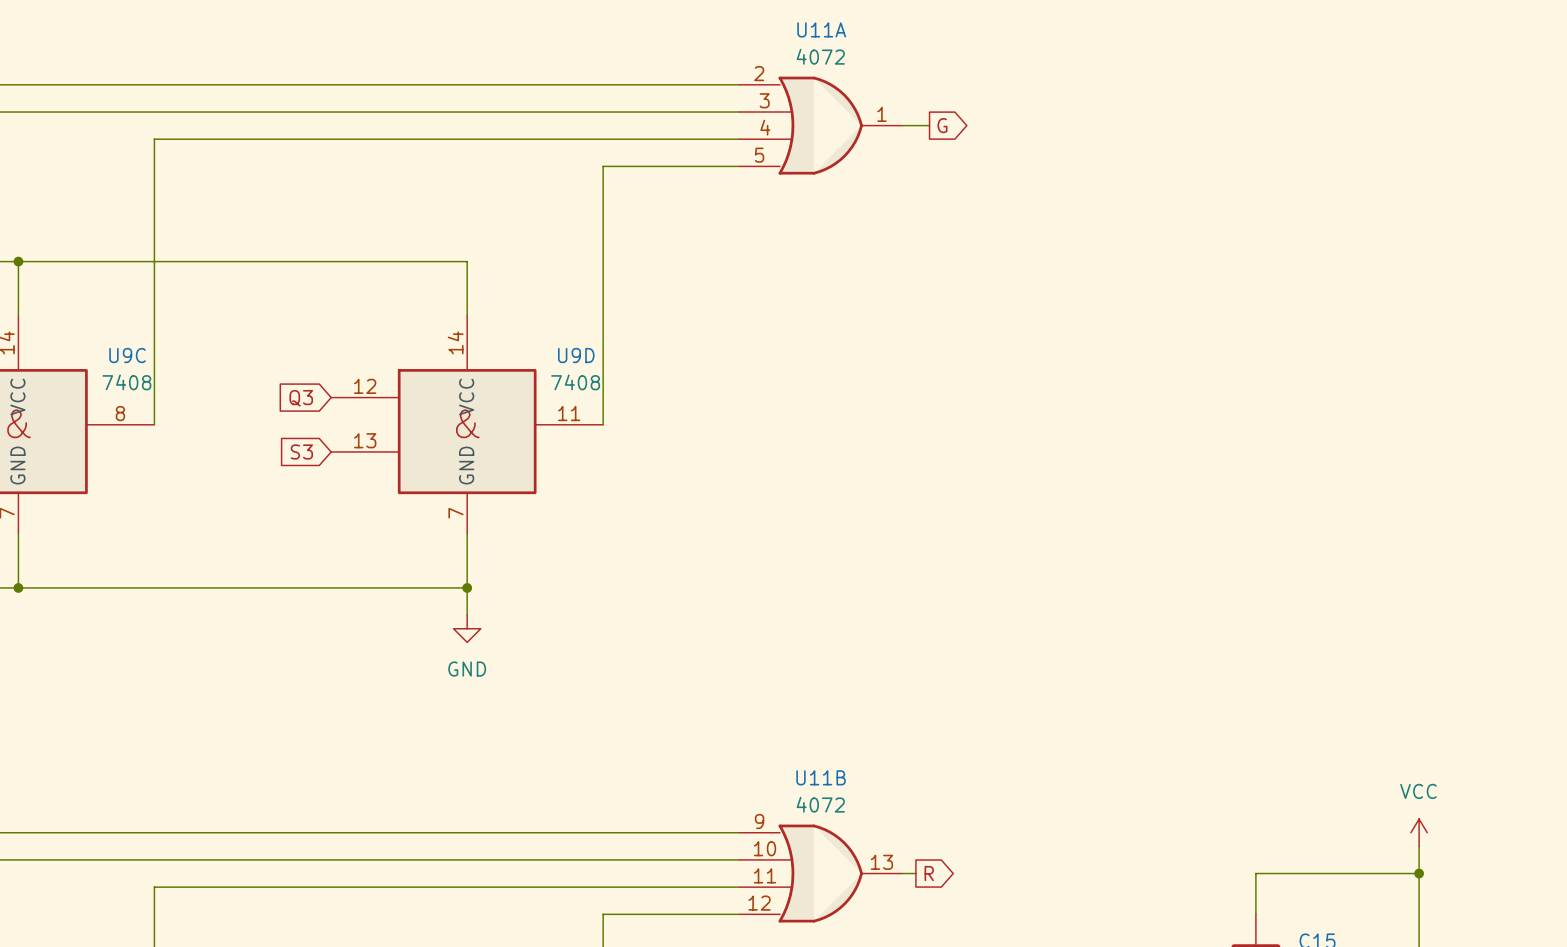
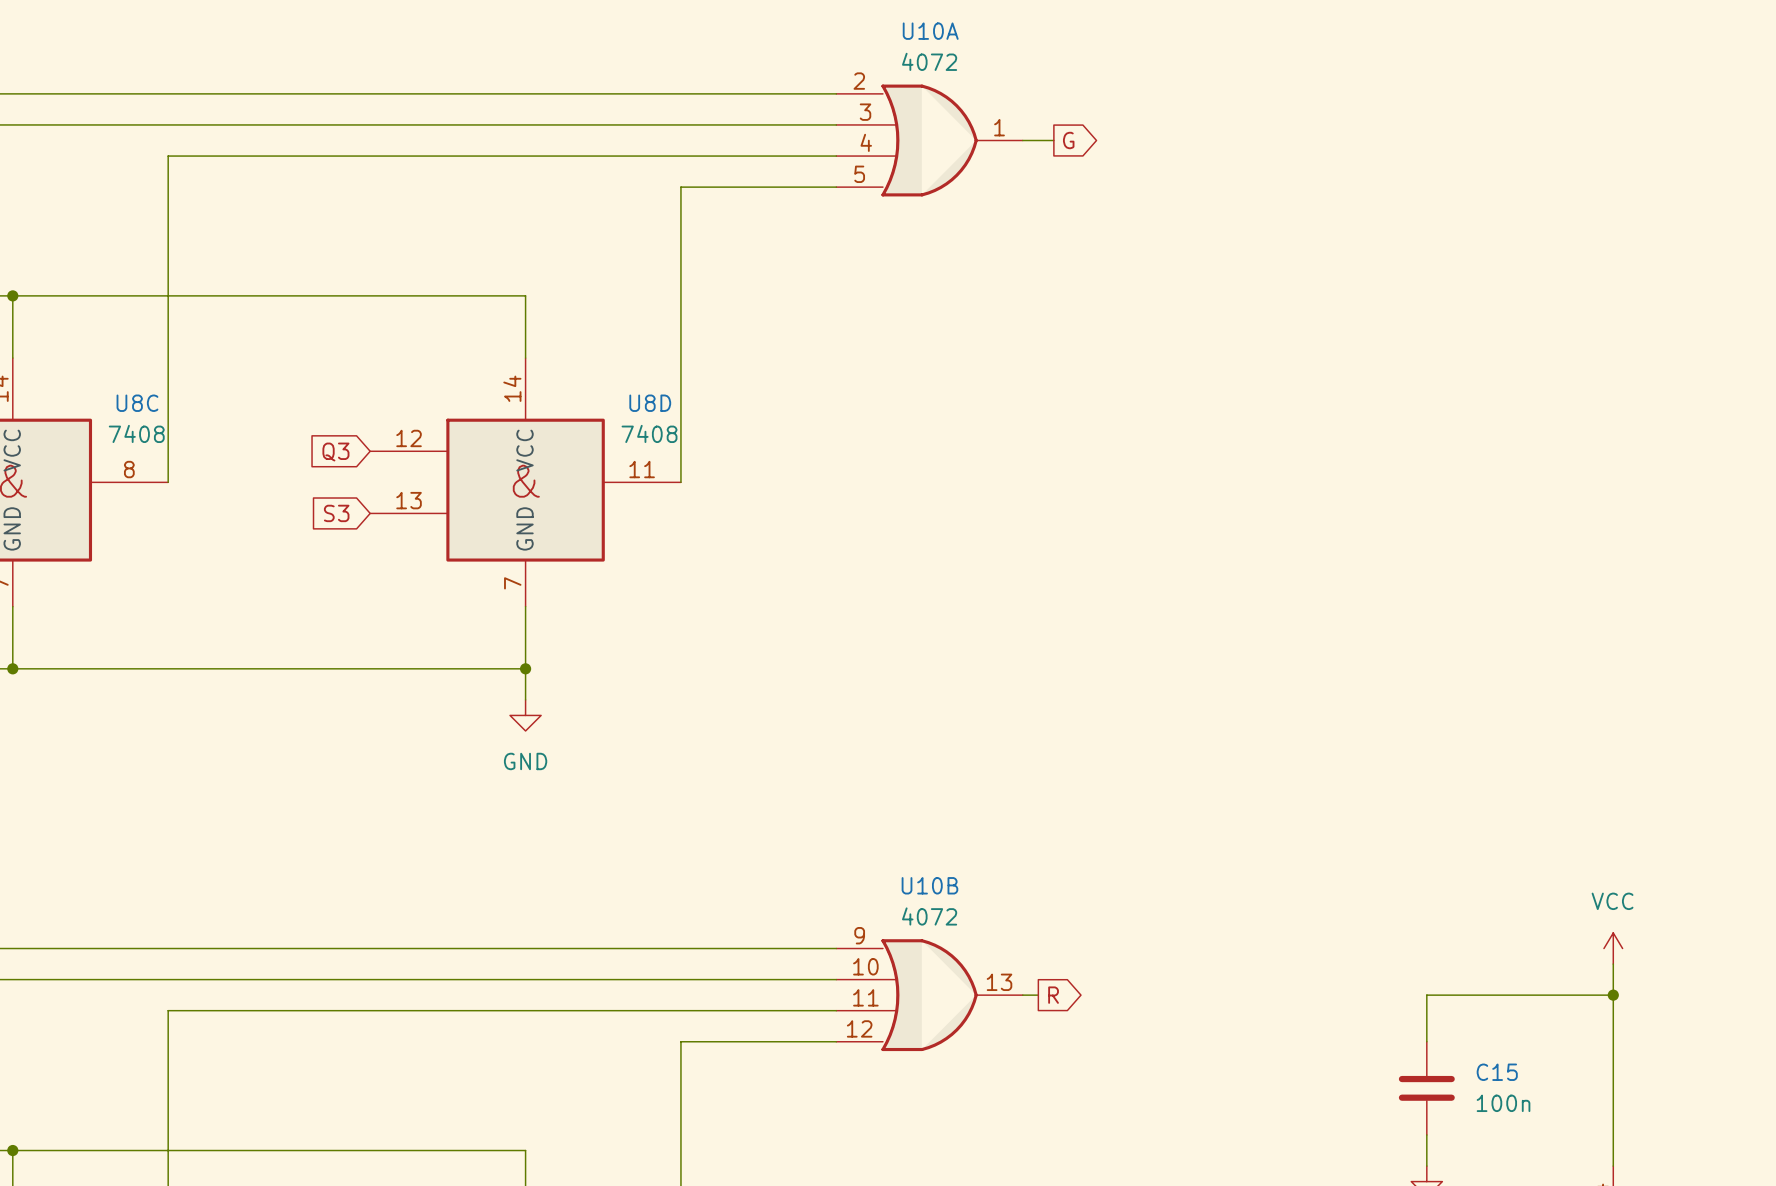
U11A name: U11A (821, 29) -> U10A (930, 31)
U9C name: U9C (127, 355) -> U8C (137, 403)
U9D name: U9D (576, 355) -> U8D (650, 403)
U11B name: U11B (821, 777) -> U10B (929, 885)

